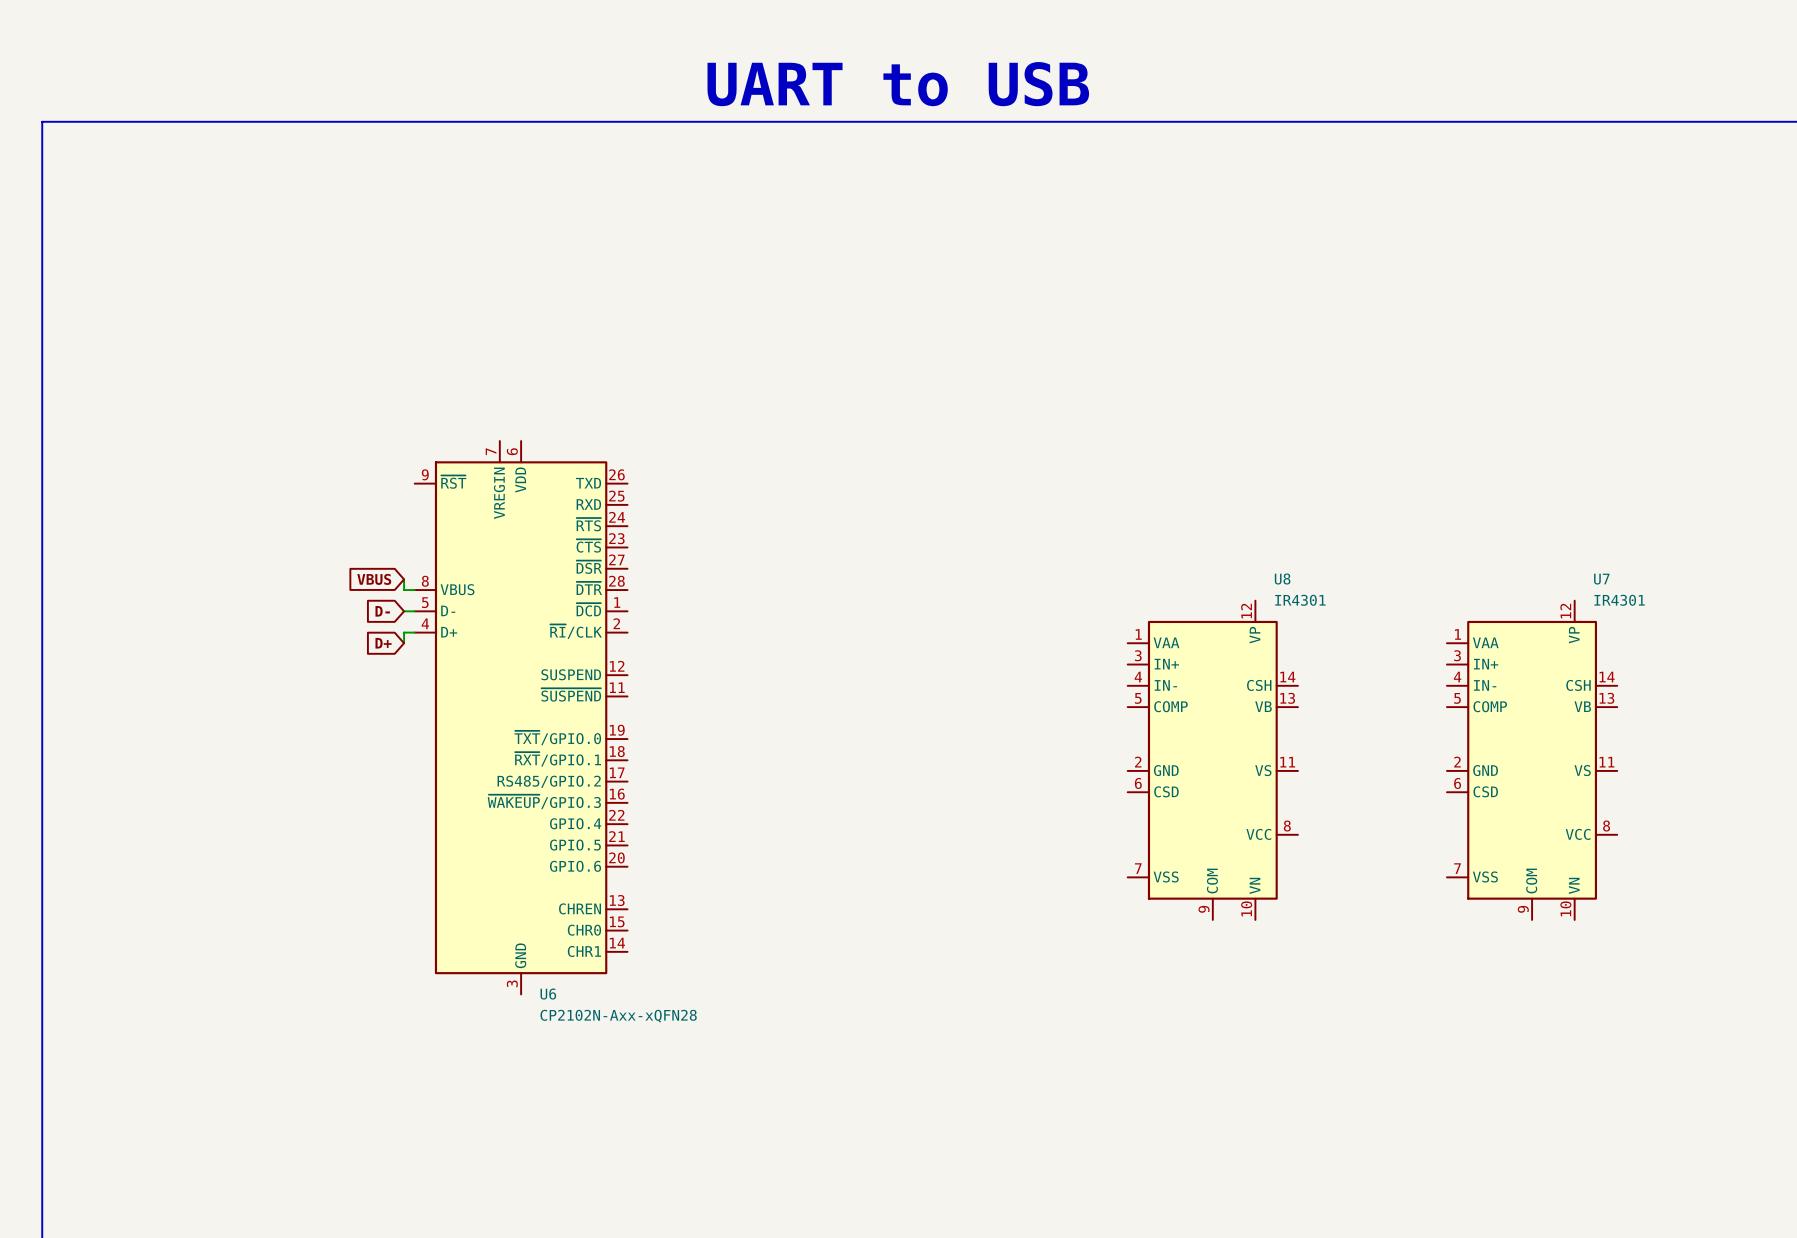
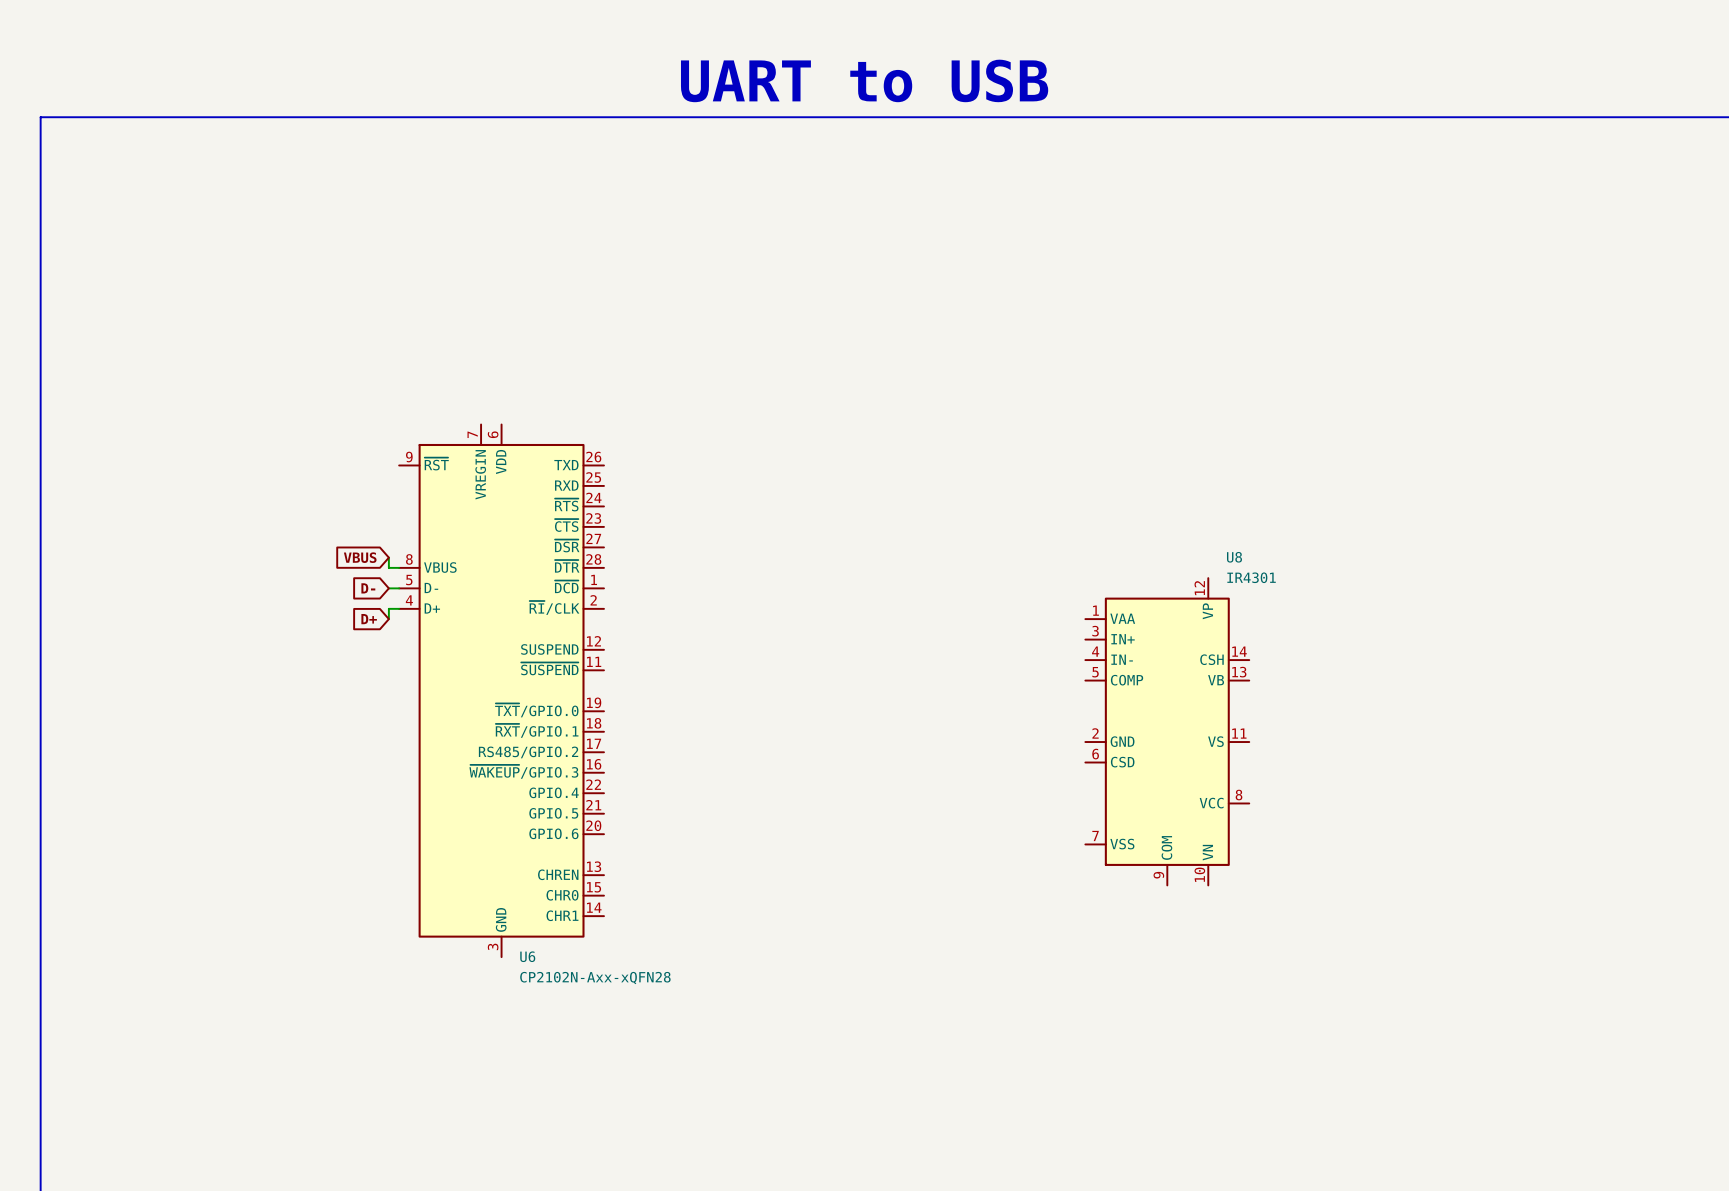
U7: IR4301 (1532, 760) -> none

